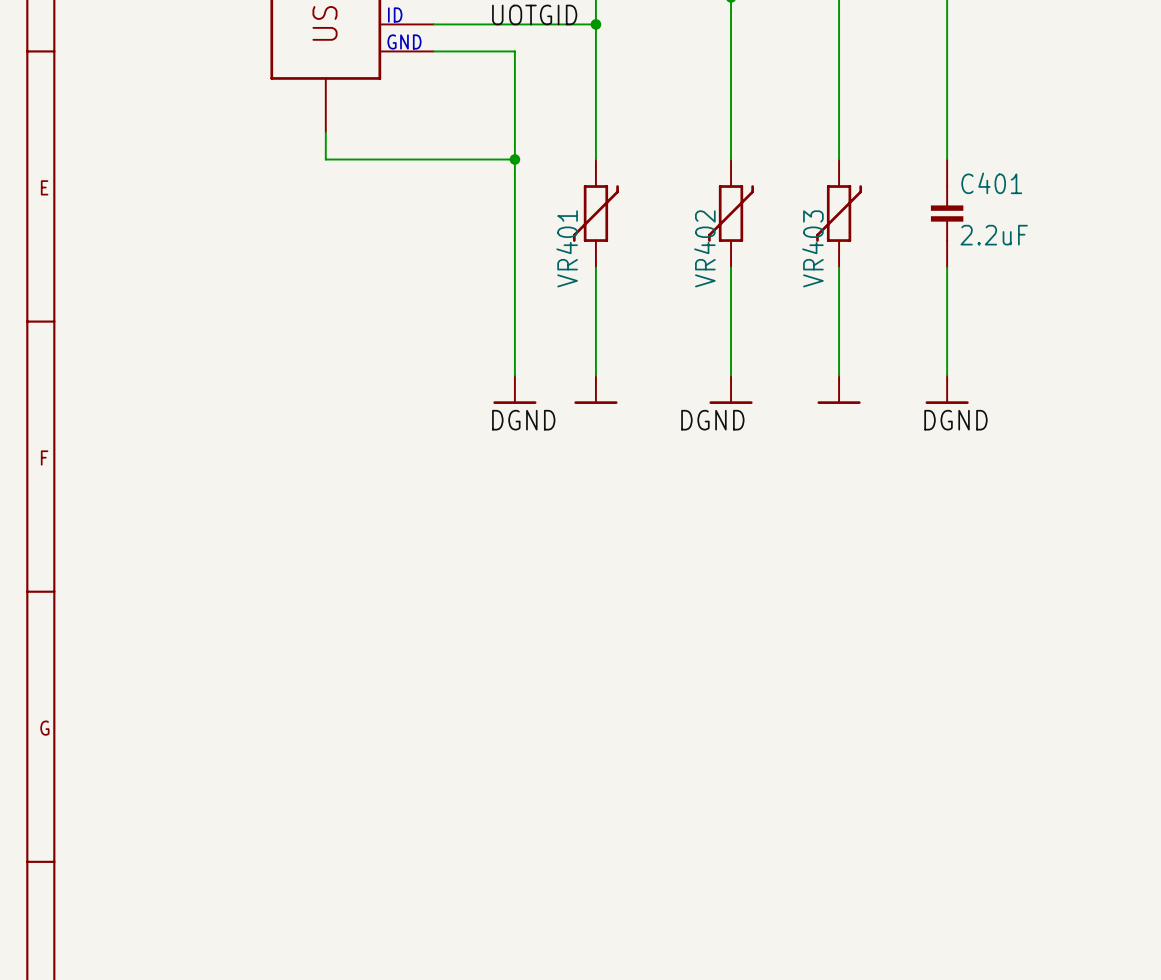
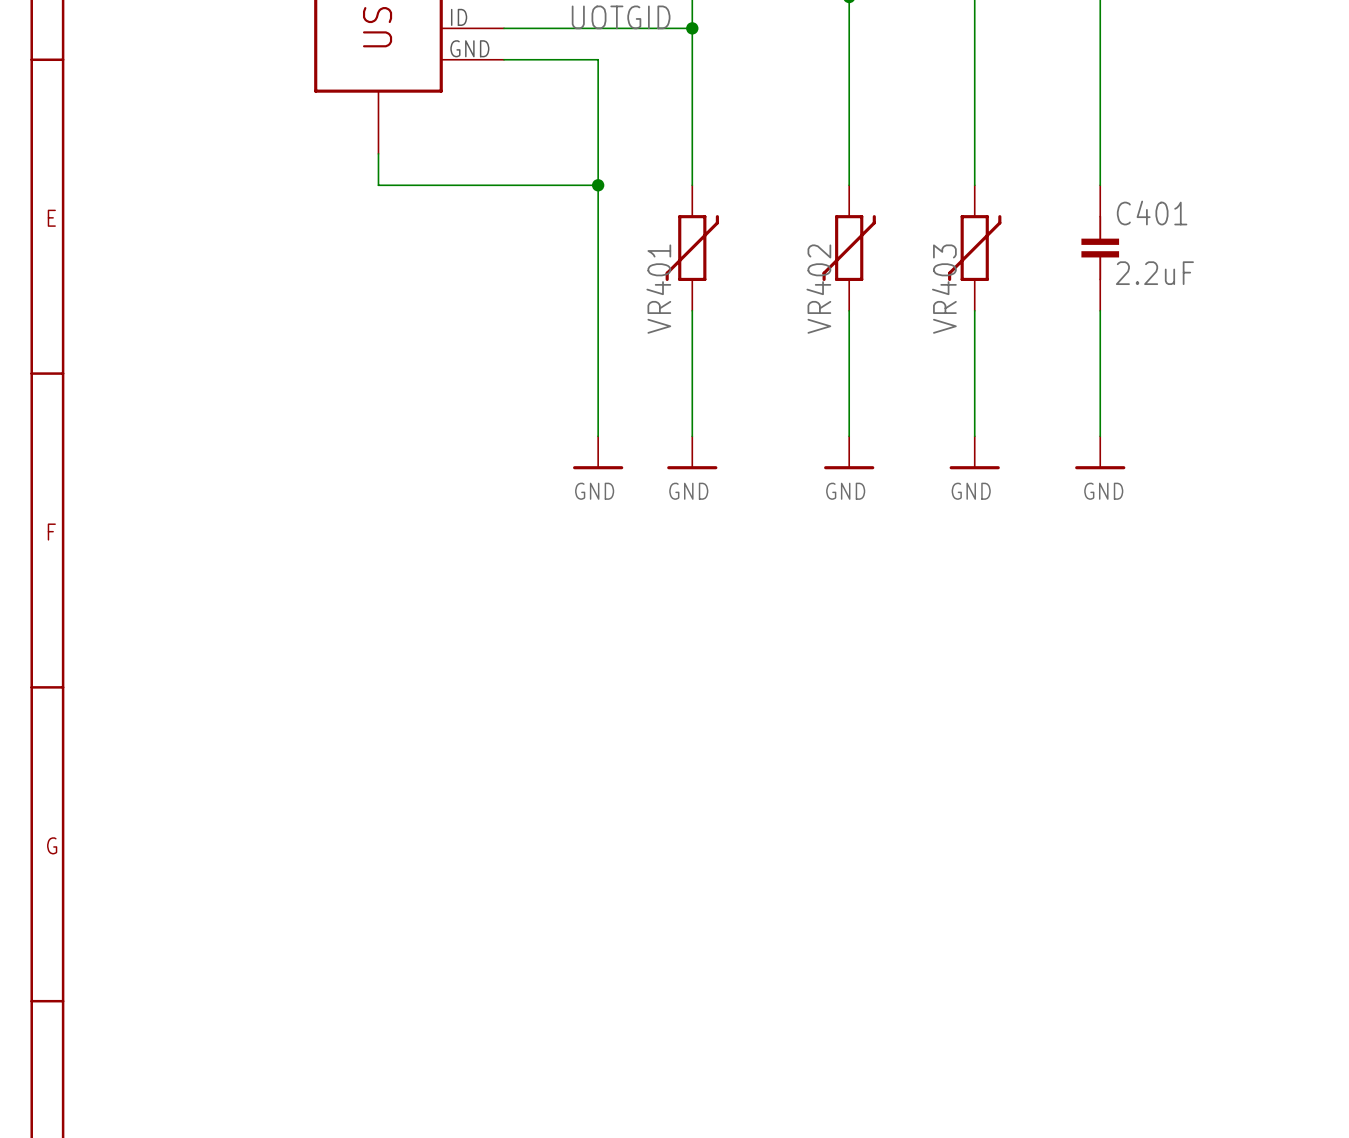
label: DGND (523, 420) -> none
label: DGND (712, 420) -> none
label: DGND (955, 420) -> none
power symbol text: none -> GND (594, 491)
power symbol text: none -> GND (688, 491)
power symbol text: none -> GND (845, 491)
power symbol text: none -> GND (971, 491)
power symbol text: none -> GND (1103, 491)

